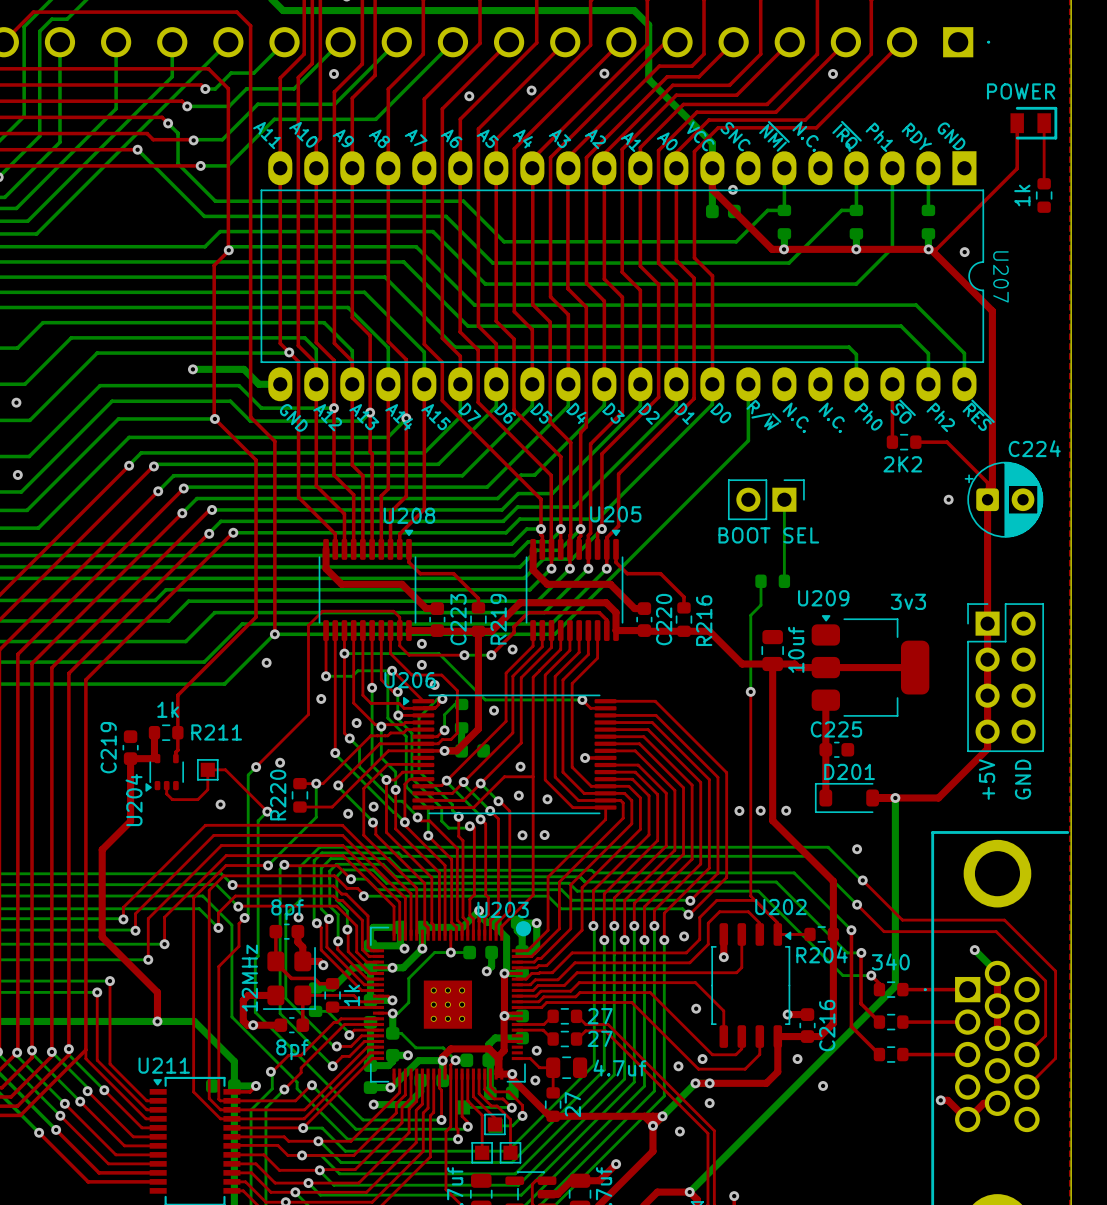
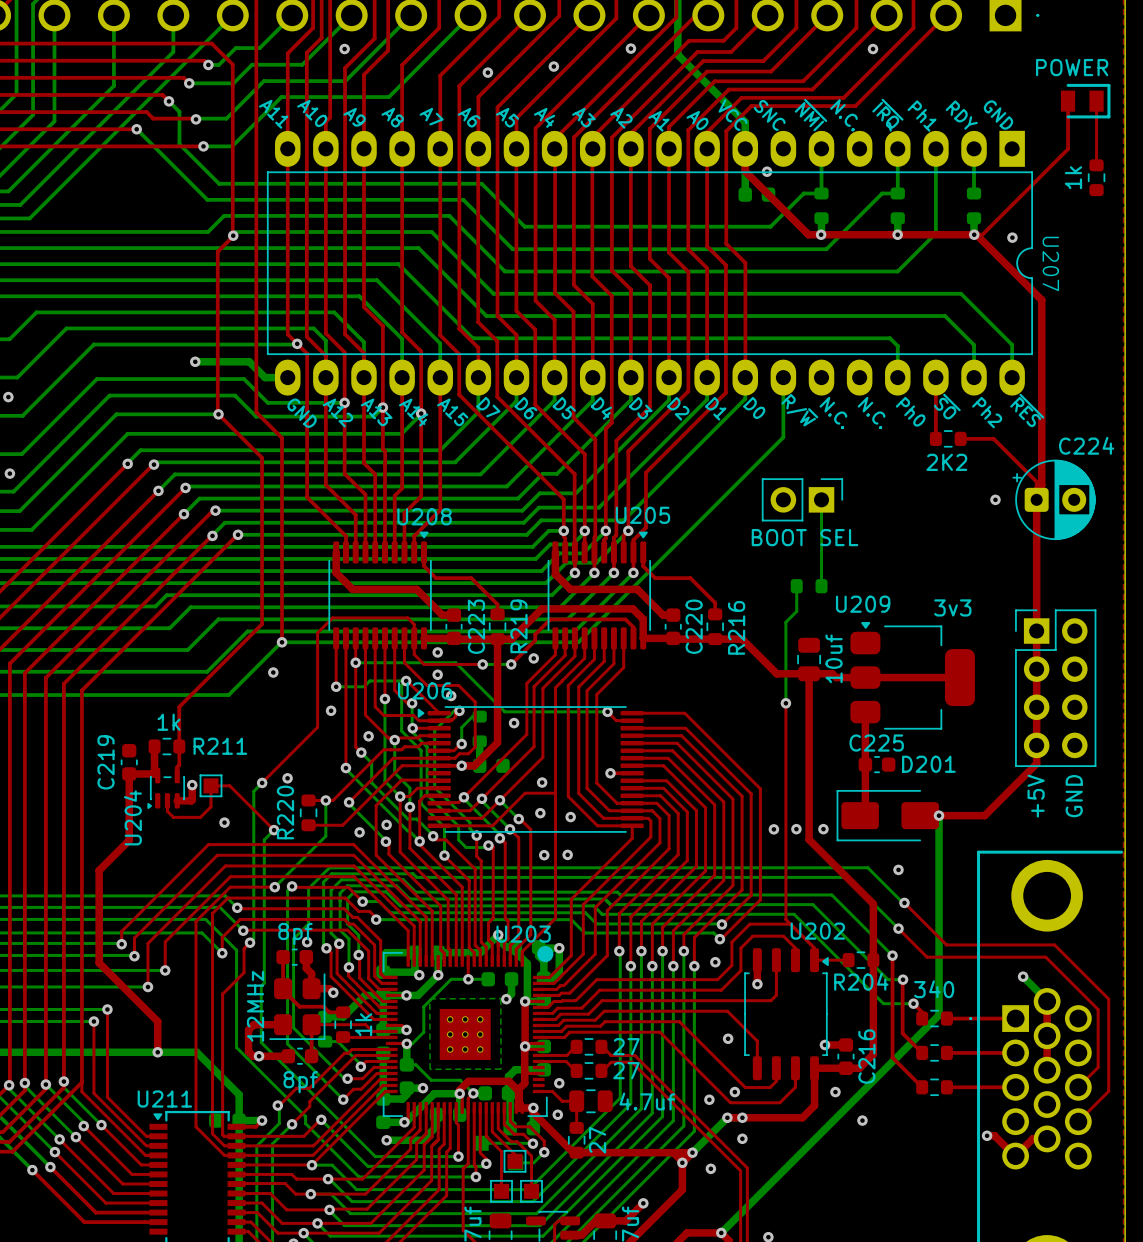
U204 footprint: [145, 754, 184, 792] -> [147, 767, 186, 809]
top track: none -> (192, 785) (192, 800) (177, 800)
via: none -> (192, 785)
D201 name position: D201 (849, 771) -> D201 (928, 764)
D201 footprint: [814, 782, 879, 814] -> [836, 789, 939, 842]
bottom zone outline: none -> (500, 998) (429, 998) (430, 1069) (501, 1069) (500, 998)

